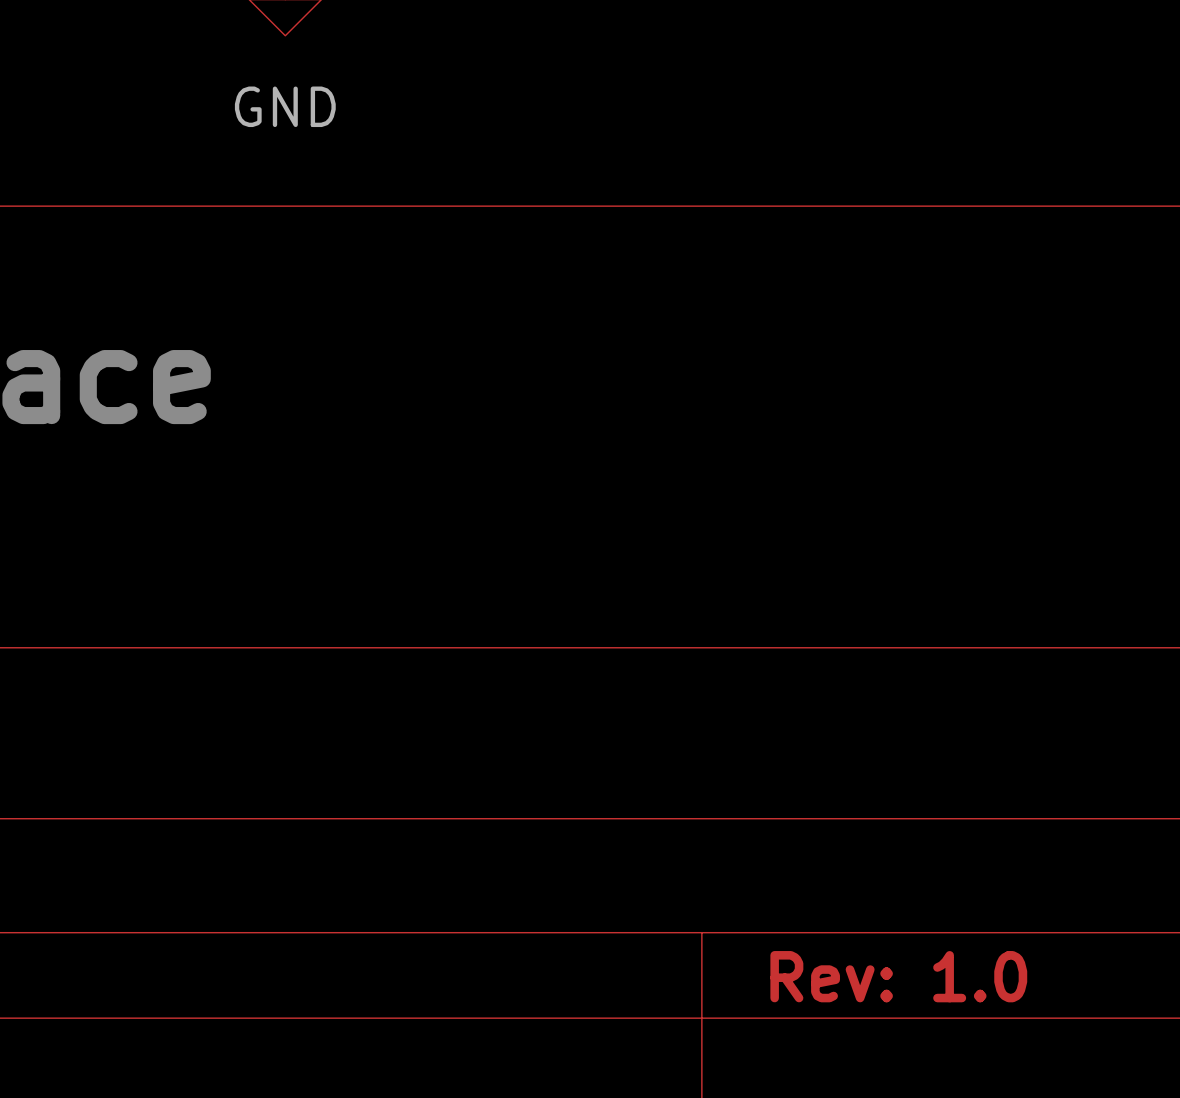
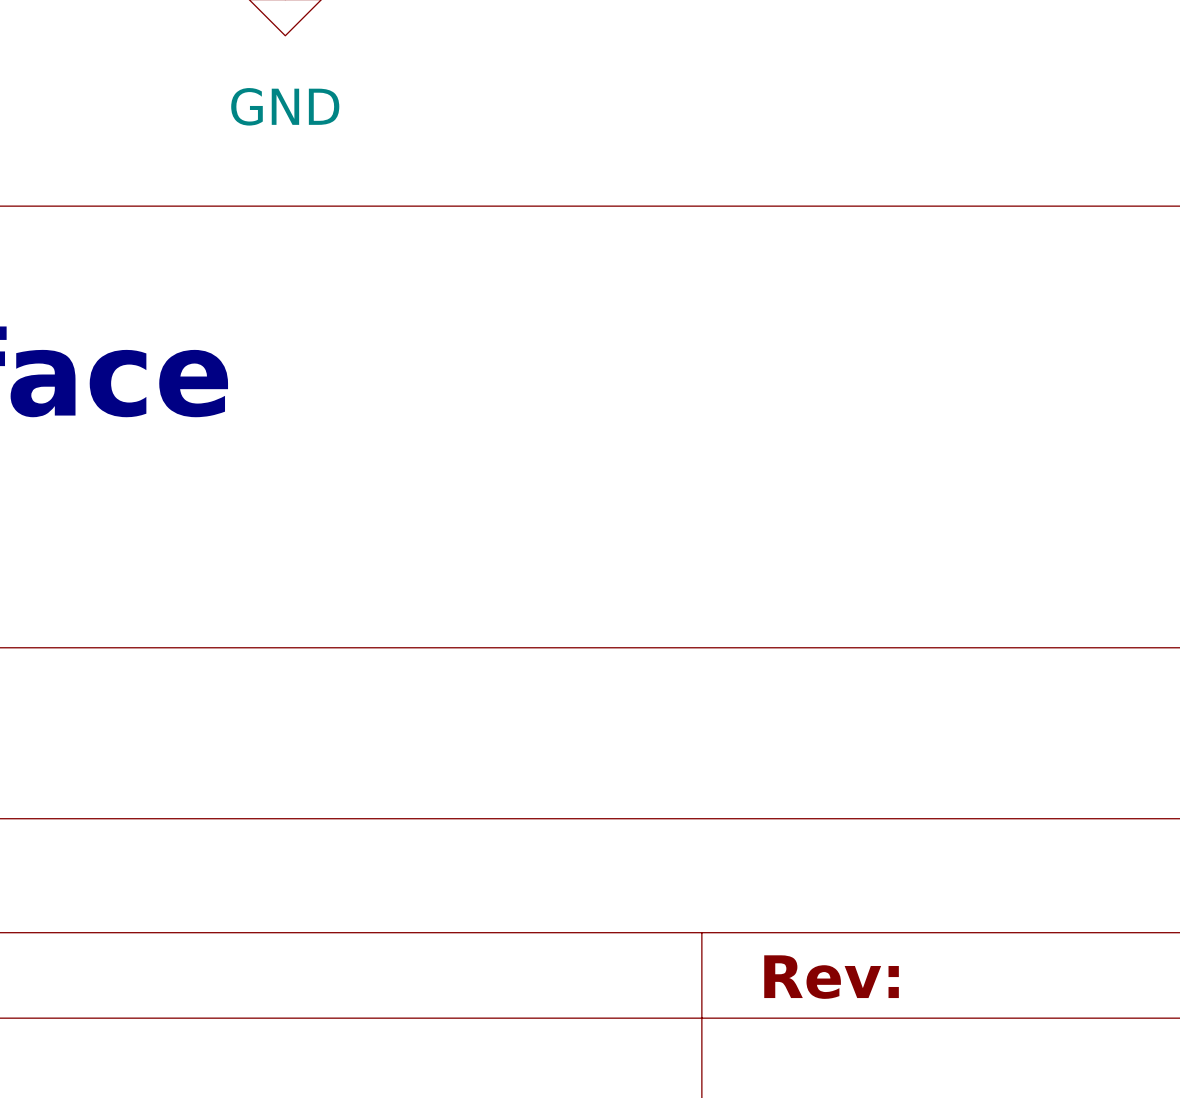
title block: Rev: 1.0 (898, 976) -> Rev: (831, 977)

